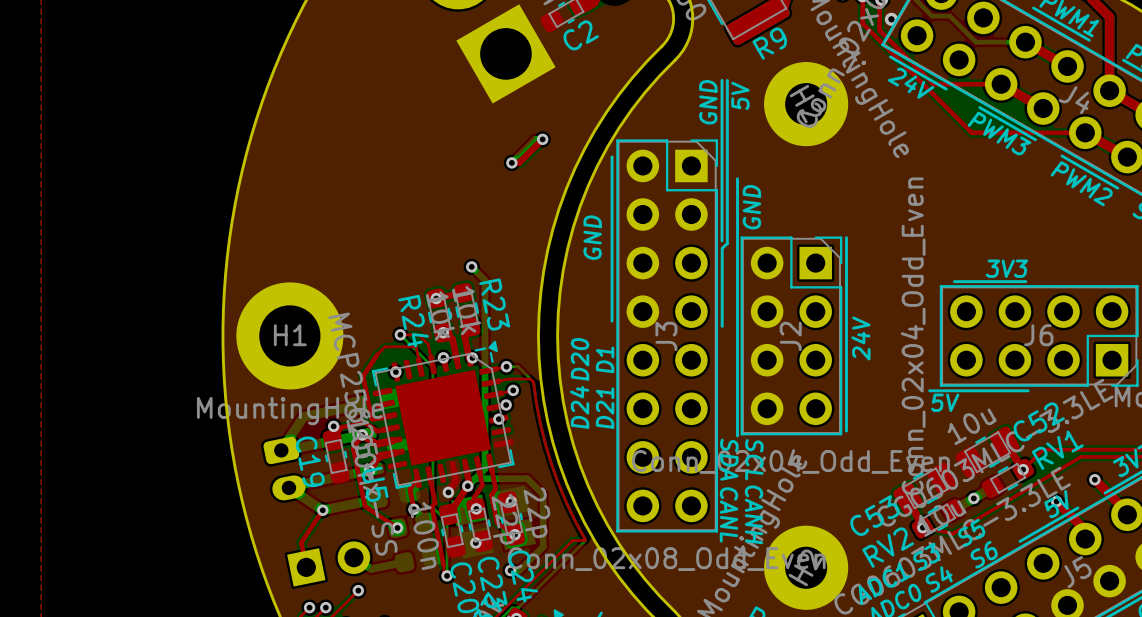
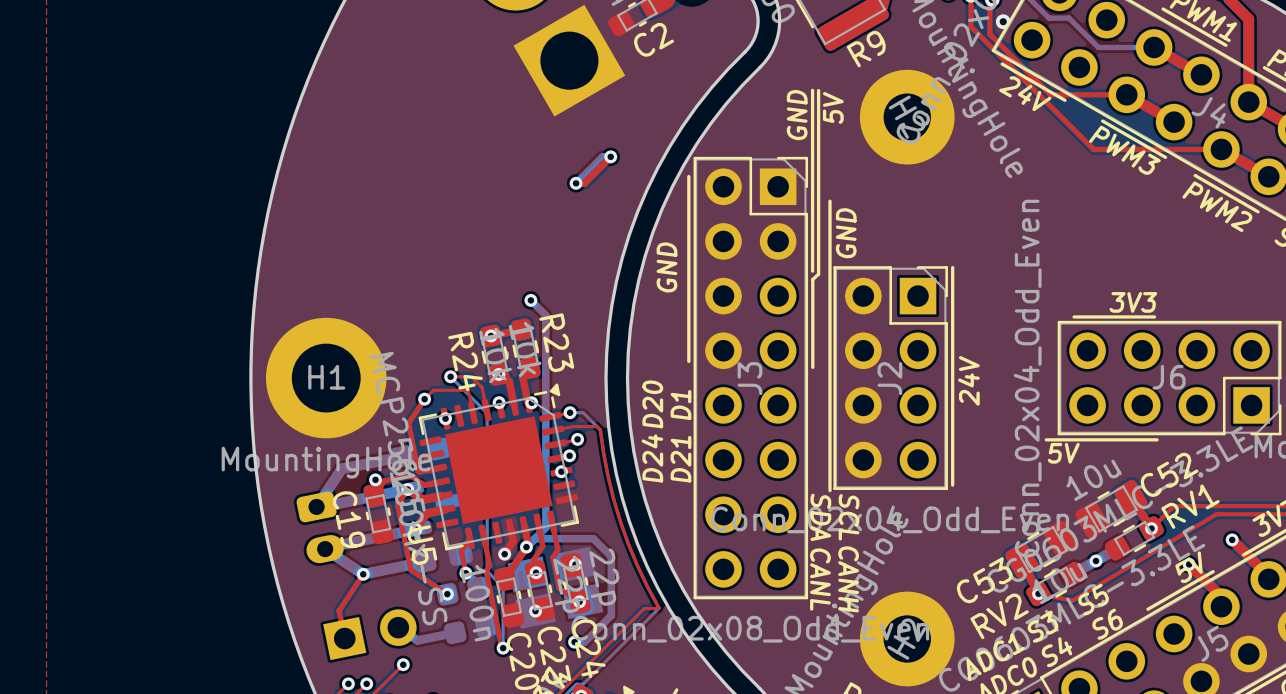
via: none -> (424, 399)

